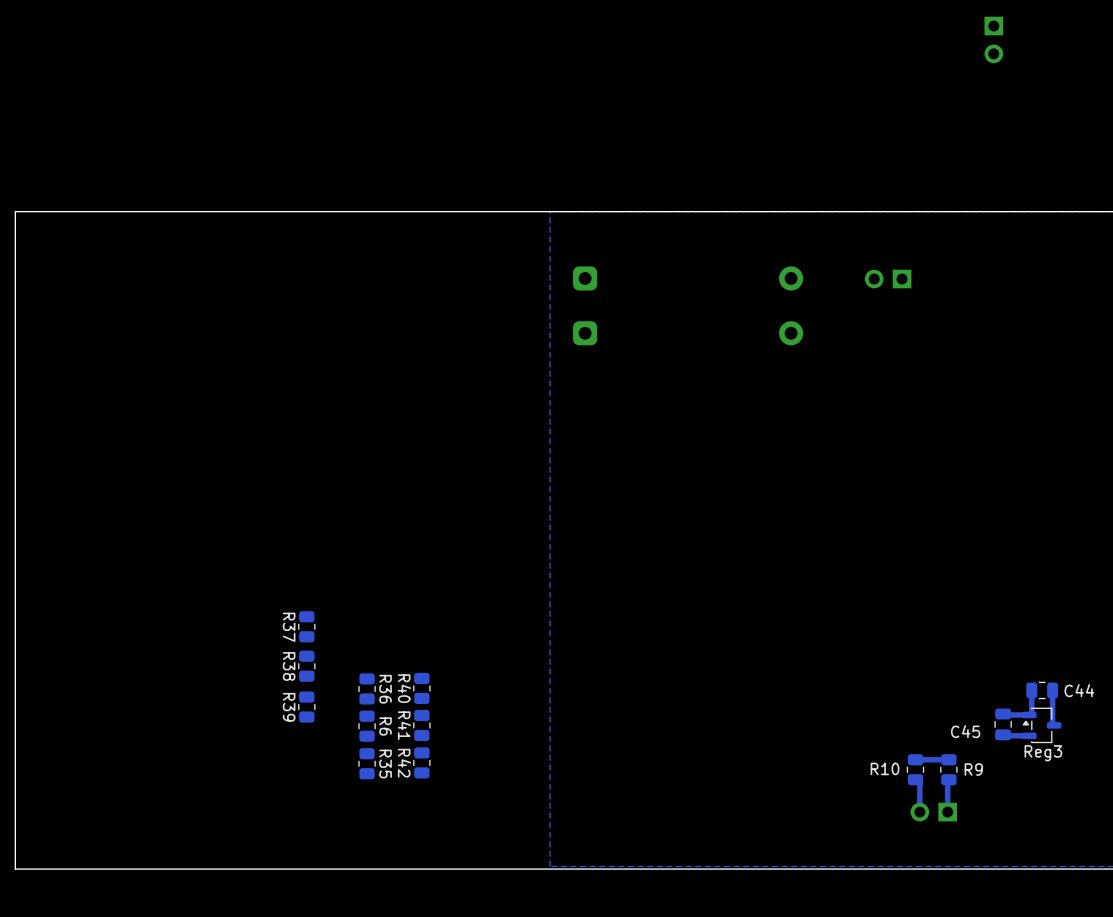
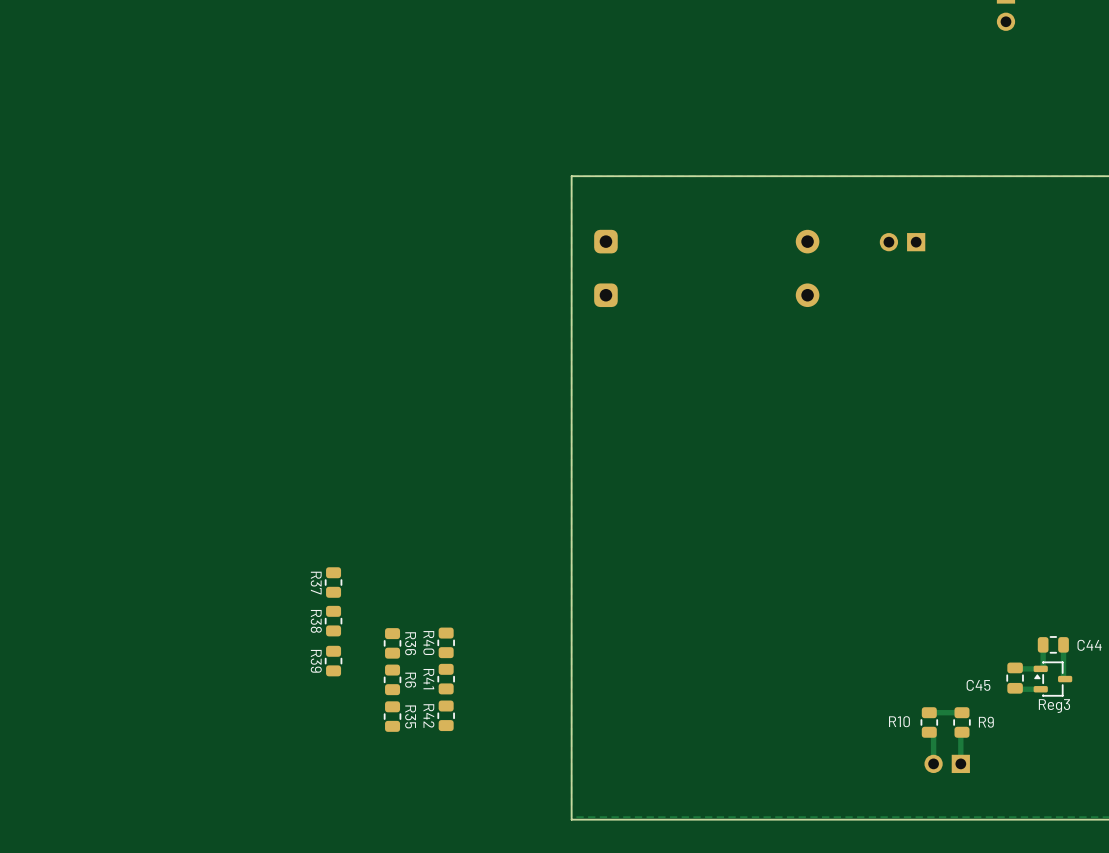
board edge: (550, 211) (15, 211) (15, 869) (550, 869) -> (571, 176) (571, 819)

